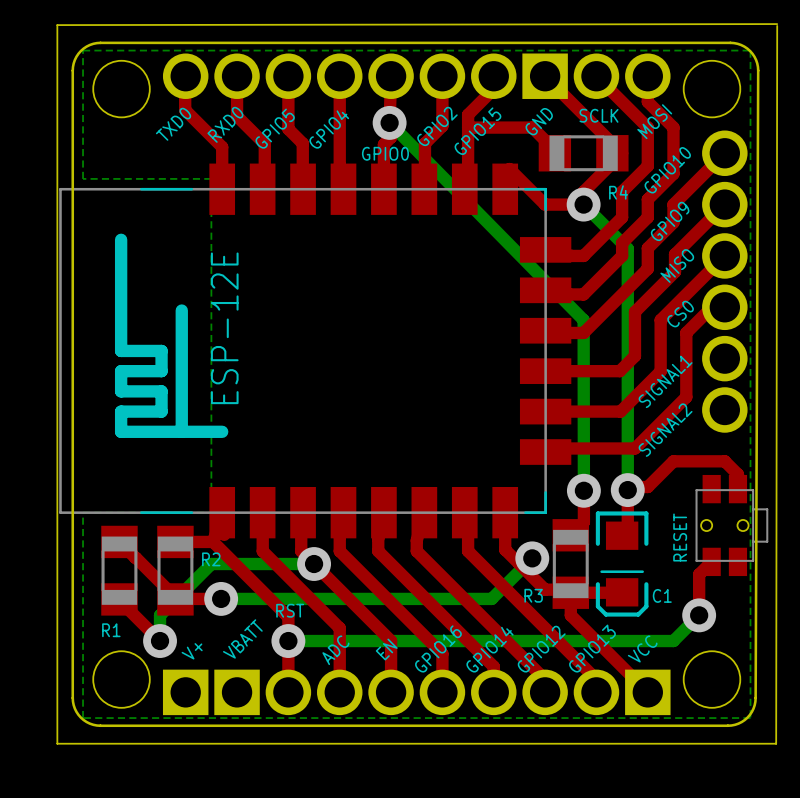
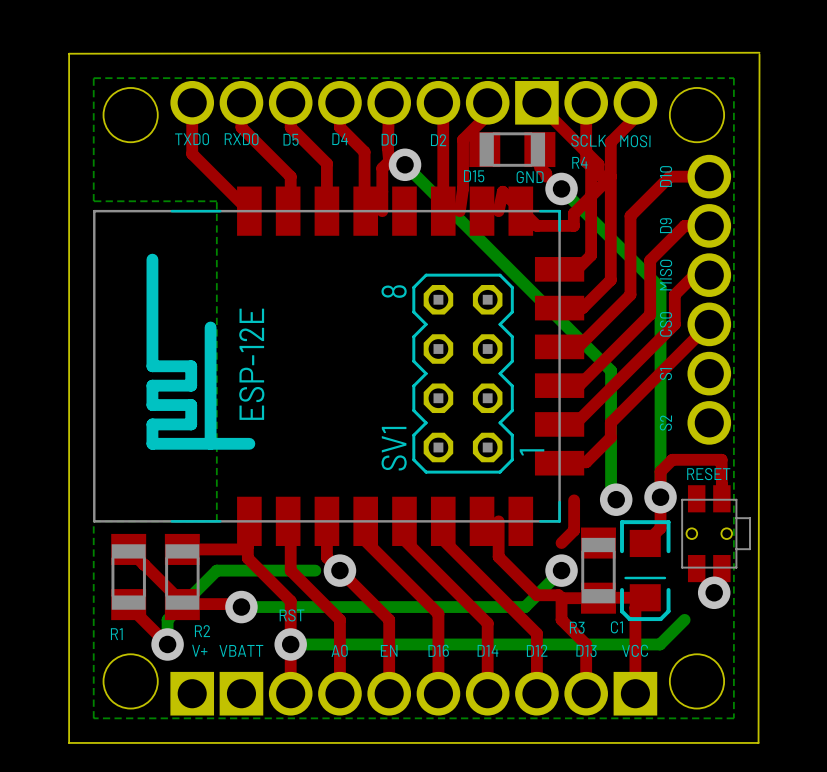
board edge: (100, 42) (730, 42) (741, 44) (750, 50) (756, 60) (758, 70) (755, 697) (753, 708) (747, 717) (738, 723) (727, 725) (100, 725) (89, 723) (80, 717) (74, 708) (72, 697) (72, 70) (74, 60) (80, 50) (89, 44) (100, 42) -> none
top track: (185, 76) (185, 110) (222, 147) (222, 189) -> (192, 102) (192, 153) (249, 211)
top track: (442, 76) (442, 126) (424, 143) (424, 189) -> (438, 102) (443, 107) (443, 211)
top track: (596, 76) (647, 127) (647, 166) (622, 191) -> (586, 102) (586, 161) (591, 166) (591, 255) (576, 270) (559, 269)
top track: (647, 91) (647, 101) (673, 127) (673, 173) (647, 199) (647, 217) (622, 243) -> (635, 117) (610, 142) (610, 213)
top track: (237, 101) (237, 116) (264, 144) (262, 189) -> (241, 127) (290, 176) (290, 208) (288, 211)
top track: (288, 101) (288, 129) (302, 143) (303, 189) -> (290, 127) (326, 163) (326, 211)
top track: (339, 101) (339, 165) (343, 189) -> (339, 127) (364, 152) (365, 211)
text: none -> D5 (291, 139)
text: none -> D4 (340, 139)
text: none -> D0 (389, 139)
text rotation: 0° (539, 121) -> 45° clockwise (530, 177)
text rotation: 0° (654, 121) -> 45.5° clockwise (635, 141)
bottom track: (389, 122) (583, 320) (583, 490) -> none
via position: (389, 122) -> (405, 164)
text rotation: 0° (173, 124) -> 44.6° clockwise (192, 139)
text rotation: 0° (225, 124) -> 45.3° clockwise (241, 139)
text: GPIO2 (437, 126) -> D2 (438, 140)
top track: (468, 127) (532, 127) (548, 143) -> none
text: GPIO5 (275, 128) -> none
text: GPIO4 (329, 129) -> none
text: GPIO15 (477, 131) -> none
bottom track: none -> (405, 164) (611, 370) (611, 497)
text: none -> D15 (474, 176)
text: GPIO0 (385, 153) -> none
R4 position: (583, 153) -> (512, 149)
top track: (724, 153) (673, 204) (673, 222) (647, 248) (647, 268) (583, 332) (545, 330) -> (709, 176) (669, 176) (630, 216) (630, 294) (578, 346) (559, 346)
bottom track: none -> (561, 188) (660, 287) (660, 497)
text: GPIO10 (667, 170) -> D10 (666, 176)
R4 name position: R4 (618, 192) -> R4 (579, 162)
bottom track: (583, 204) (627, 248) (627, 490) -> none
via position: (583, 204) -> (561, 188)
top track: (724, 204) (675, 254) (675, 271) (634, 311) (634, 356) (619, 371) (589, 371) -> (709, 225) (684, 225) (650, 260) (650, 314) (579, 385)
top track: (622, 217) (583, 255) (571, 255) (545, 249) -> (610, 238) (610, 262)
text: GPIO9 (670, 221) -> D9 (665, 225)
top track: (622, 255) (583, 294) (545, 290) -> (610, 275) (610, 280) (582, 308) (559, 308)
top track: (724, 255) (660, 320) (660, 371) -> (709, 324) (647, 385)
top track: none -> (709, 275) (694, 275) (674, 294) (674, 324) (574, 424)
text rotation: 0° (677, 266) -> 44.2° counterclockwise (666, 275)
top track: (724, 307) (711, 307) (686, 332) (686, 397) (634, 448) (549, 448) (545, 452) -> none
text rotation: 0° (680, 314) -> 44.8° counterclockwise (665, 324)
ESP-12E position: (315, 350) -> (338, 366)
SV1: none -> (463, 373)
text: none -> S1 (665, 374)
text: SIGNAL1 (665, 381) -> none
top track: (622, 409) (620, 411) (584, 411) -> (610, 422) (610, 437) (586, 462) (559, 463)
text: none -> S2 (665, 423)
text: SIGNAL2 (665, 430) -> none
top track: (737, 474) (724, 461) (673, 461) (647, 486) (630, 486) (627, 490) (627, 530) (622, 535) -> (721, 484) (721, 459) (672, 459) (660, 471) (660, 528) (645, 543)
via: none -> (660, 497)
via: (583, 490) -> none
top track: (262, 512) (262, 551) (339, 628) -> (288, 521) (290, 523) (290, 570) (339, 619) (339, 632)
top track: (303, 512) (301, 551) (391, 641) -> (326, 521) (326, 557) (389, 619) (389, 644)
top track: (343, 512) (339, 551) (442, 653) -> (365, 521) (365, 540) (438, 613) (438, 656)
top track: (383, 512) (378, 538) (378, 551) (493, 666) -> (404, 521) (401, 524) (401, 536) (487, 623) (487, 669)
top track: (424, 512) (416, 540) (416, 551) (545, 679) -> (443, 521) (442, 539) (536, 633) (536, 681)
top track: (464, 512) (468, 551) (596, 679) -> none
top track: (224, 534) (222, 512) (213, 541) (288, 615) -> (249, 521) (247, 558) (290, 601) (290, 619)
RESET name rotation: 0° (680, 537) -> 90° clockwise (708, 474)
RESET name position: RESET (680, 537) -> RESET (708, 474)
top track: none -> (247, 545) (244, 549) (218, 549)
bottom track: (532, 558) (491, 598) (221, 598) -> none
via: (532, 558) -> none
R2 name position: R2 (211, 559) -> R2 (202, 631)
top track: (711, 561) (699, 574) (699, 615) -> none
via position: (314, 564) -> (339, 570)
bottom track: none -> (561, 570) (525, 607) (241, 607)
R3 position: (570, 564) -> (598, 570)
via: none -> (561, 570)
C1 position: (622, 564) -> (645, 570)
top track: none -> (610, 597) (645, 597) (635, 607) (635, 693)
R3 name position: R3 (533, 595) -> R3 (577, 627)
C1 name position: C1 (662, 595) -> C1 (616, 627)
via position: (221, 598) -> (241, 607)
via position: (699, 615) -> (714, 592)
text rotation: 0° (242, 638) -> 44.9° clockwise (241, 650)
top track: (596, 641) (647, 692) -> (586, 644) (586, 681)
text: GPIO16 (438, 648) -> D16 (438, 650)
text: GPIO13 (592, 648) -> D13 (586, 650)
text rotation: 0° (642, 648) -> 43.9° clockwise (635, 650)
text rotation: 0° (386, 649) -> 44.8° clockwise (389, 650)
text: GPIO14 (490, 649) -> D14 (487, 650)
text: GPIO12 (541, 649) -> D12 (537, 650)
text: ADC (335, 650) -> A0 (339, 650)
text rotation: 0° (192, 651) -> 46.5° clockwise (199, 650)

